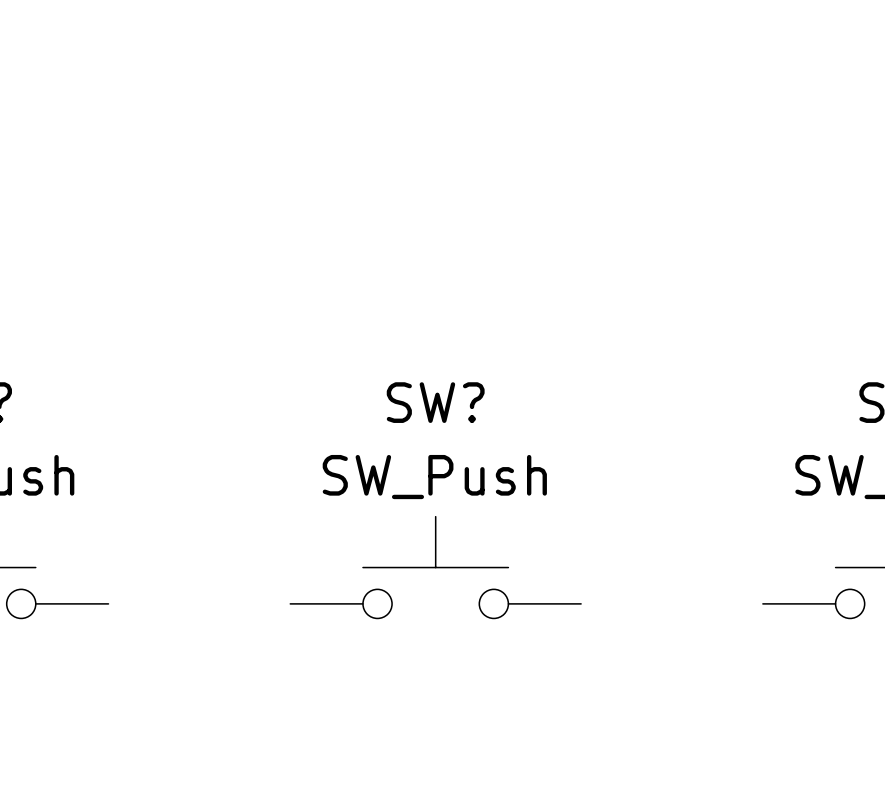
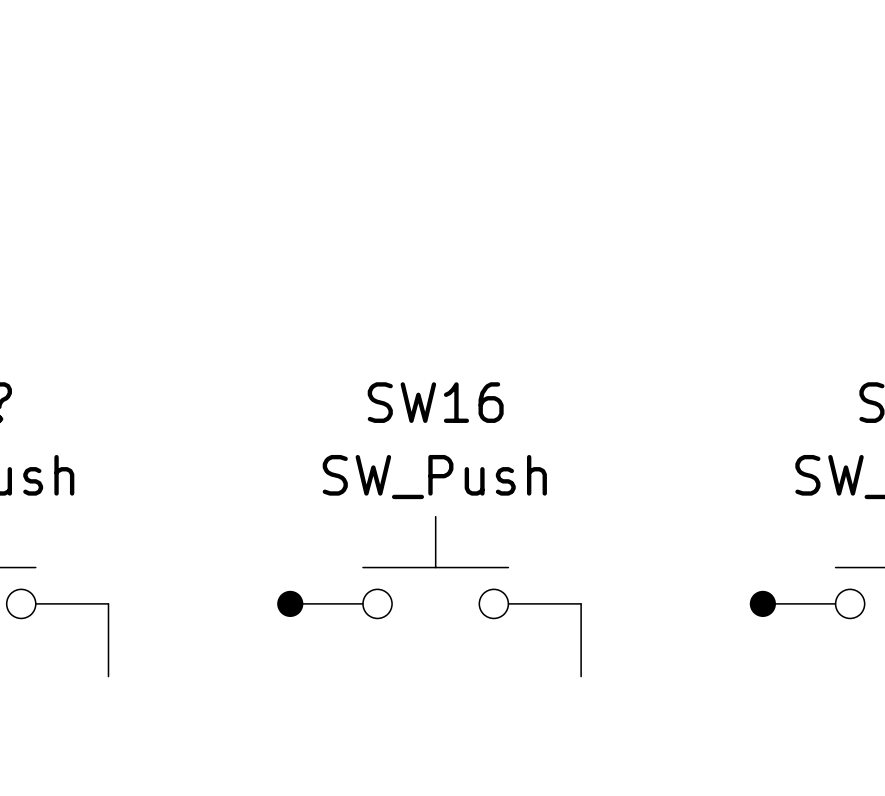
SW? name: SW? (435, 402) -> SW16 (435, 402)
wire: none -> (108, 603) (108, 676)
junction: none -> (290, 603)
wire: none -> (581, 603) (581, 676)
junction: none -> (762, 603)

